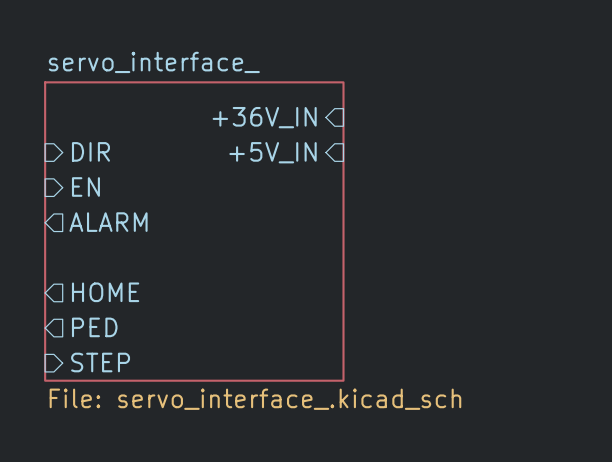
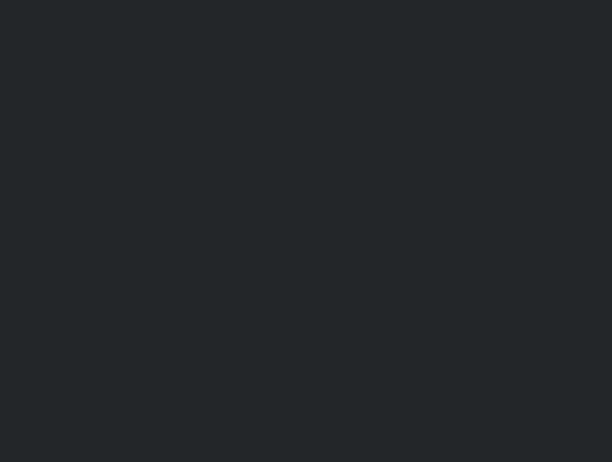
sheet pin: +36V_IN (264, 117) -> none
sheet pin: DIR (90, 151) -> none
sheet pin: +5V_IN (273, 152) -> none
sheet pin: EN (85, 187) -> none
sheet pin: ALARM (108, 222) -> none
sheet servo_interface_: File: servo_interface_.kicad_sch (194, 231) -> none
sheet pin: HOME (105, 292) -> none
sheet pin: PED (94, 327) -> none
sheet pin: STEP (100, 362) -> none

